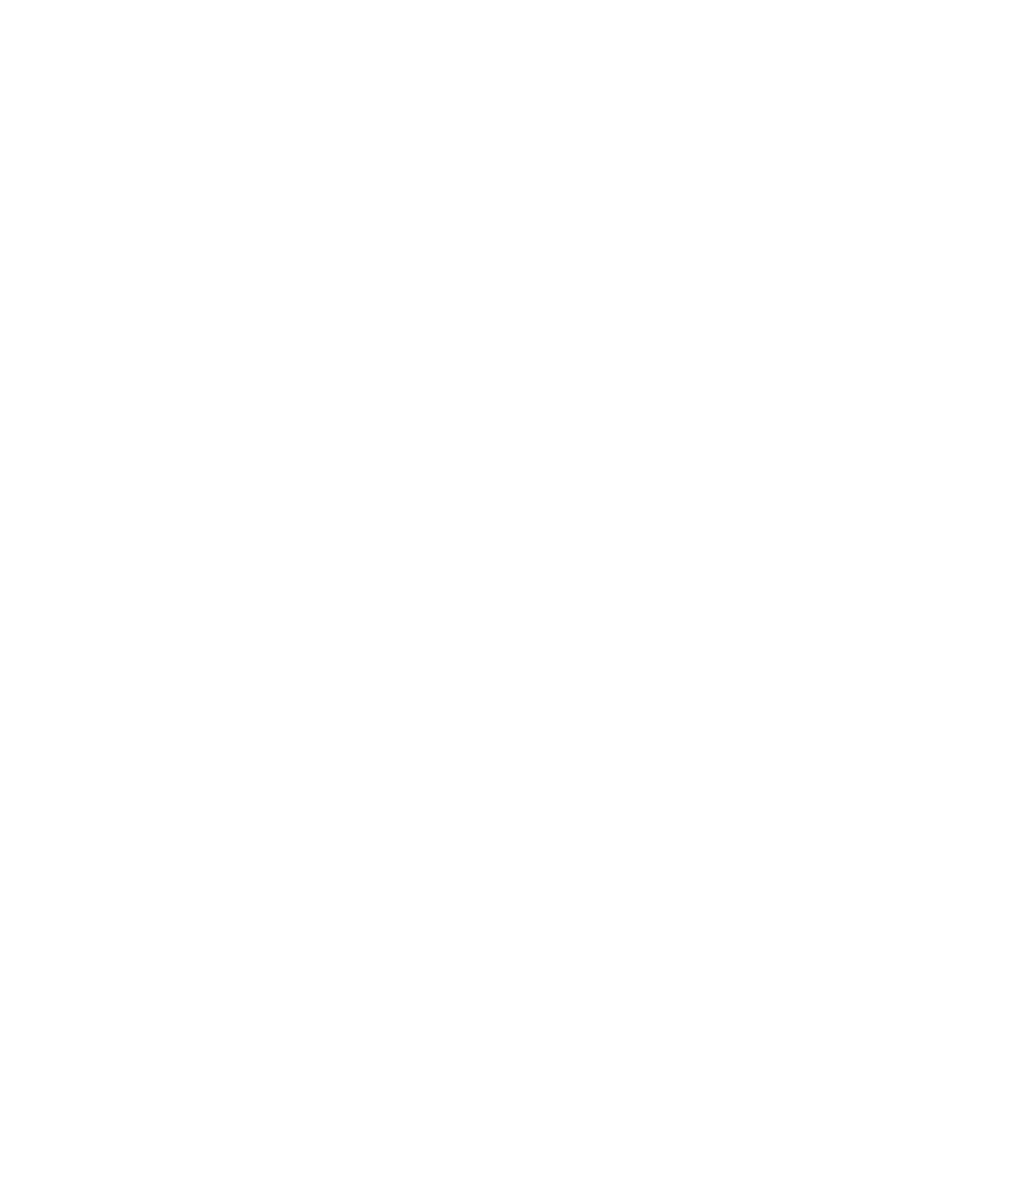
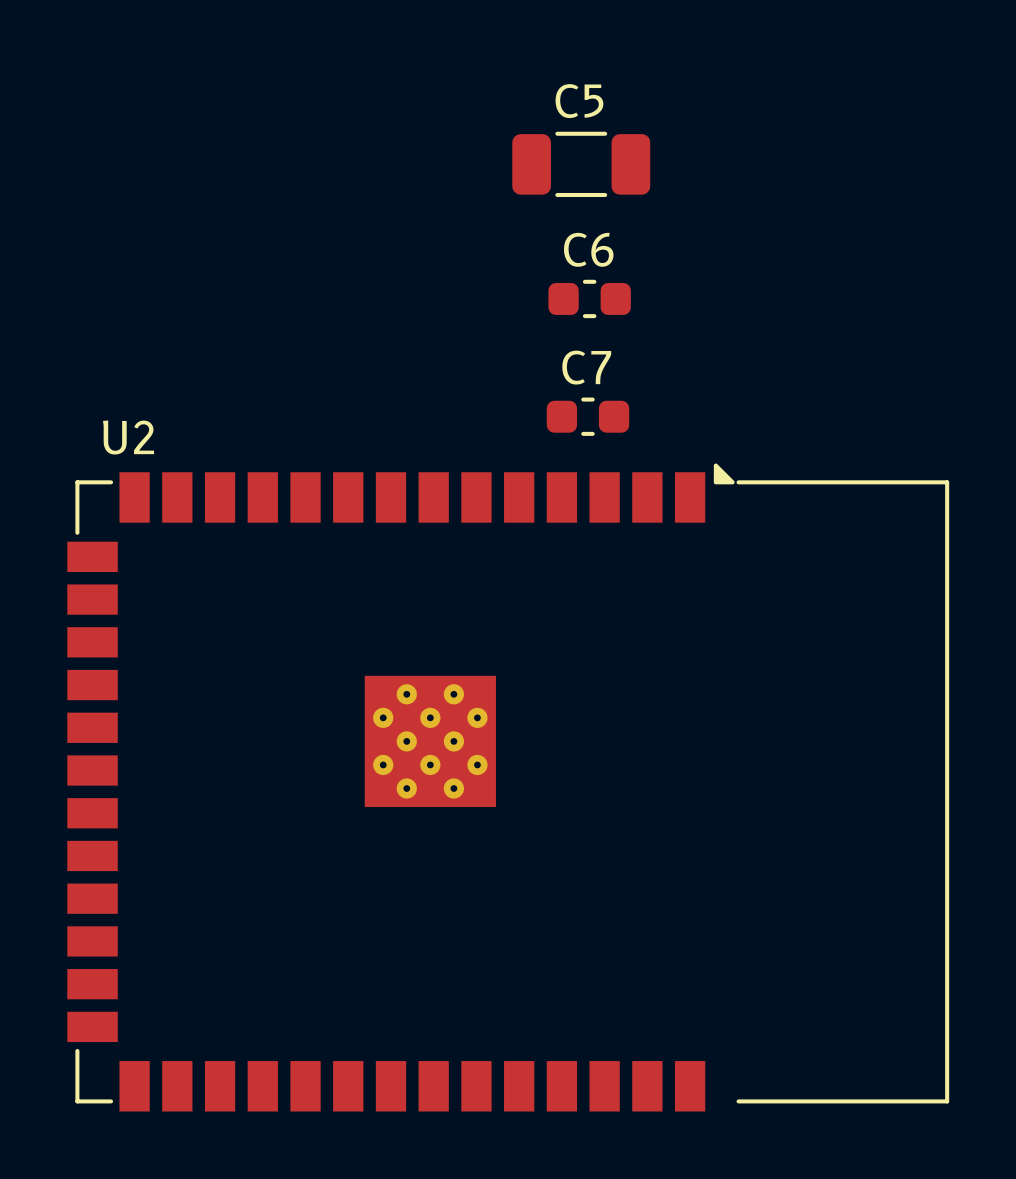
C5: none -> (581, 164)
C6: none -> (589, 298)
C7: none -> (587, 416)
U2: none -> (508, 787)

